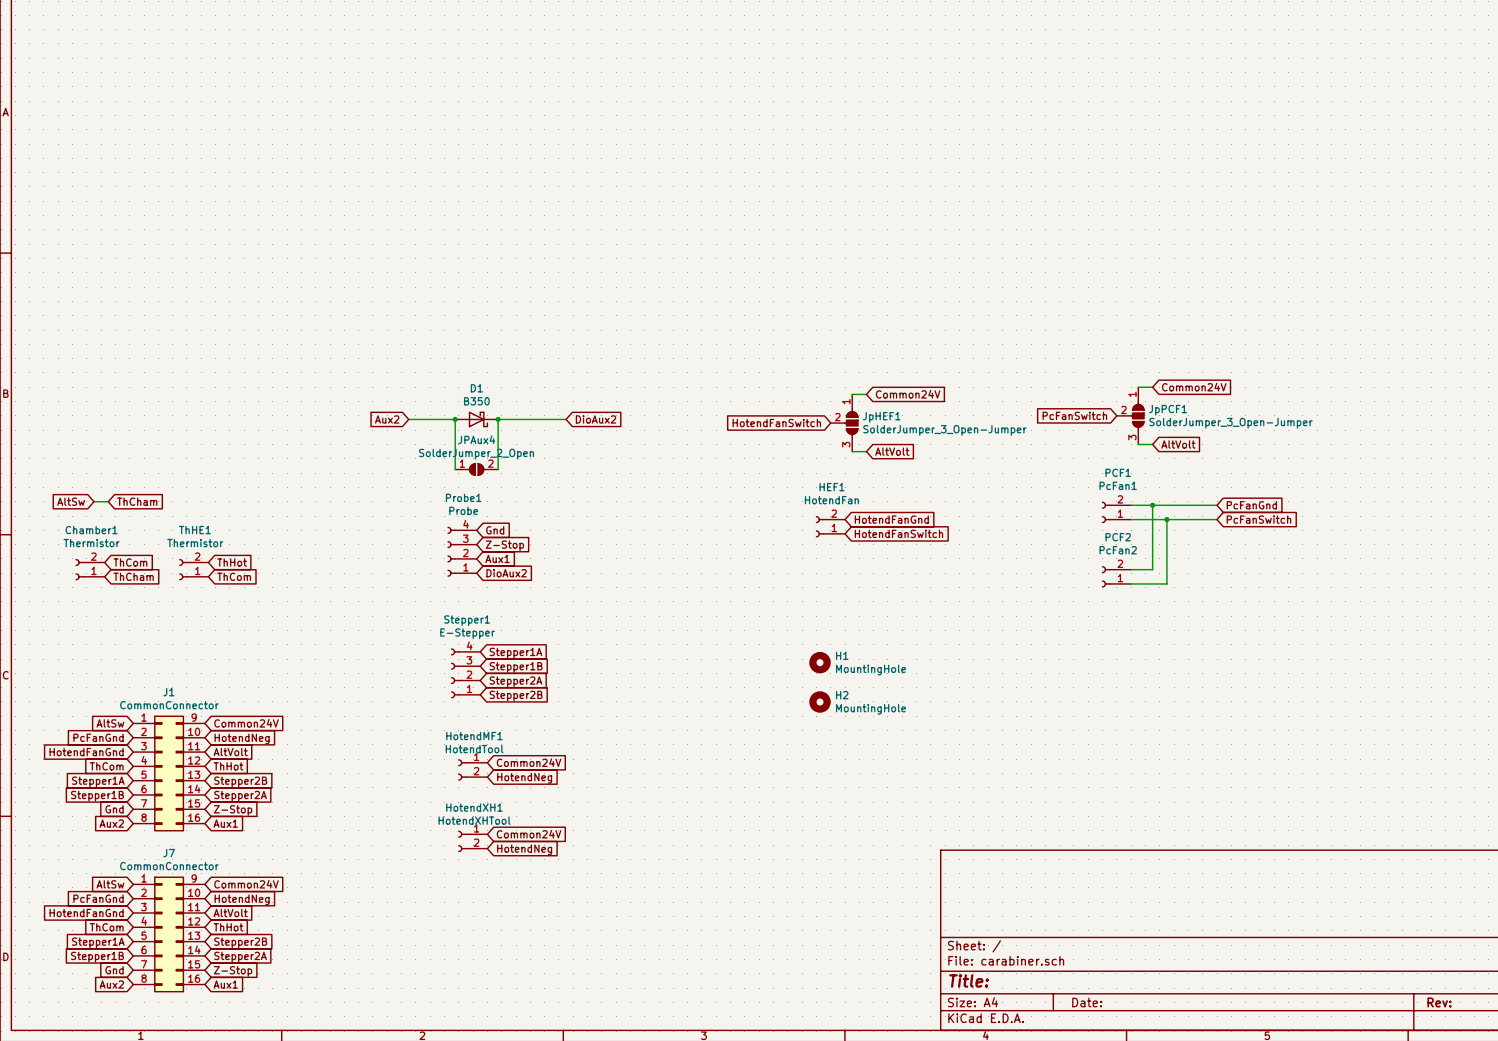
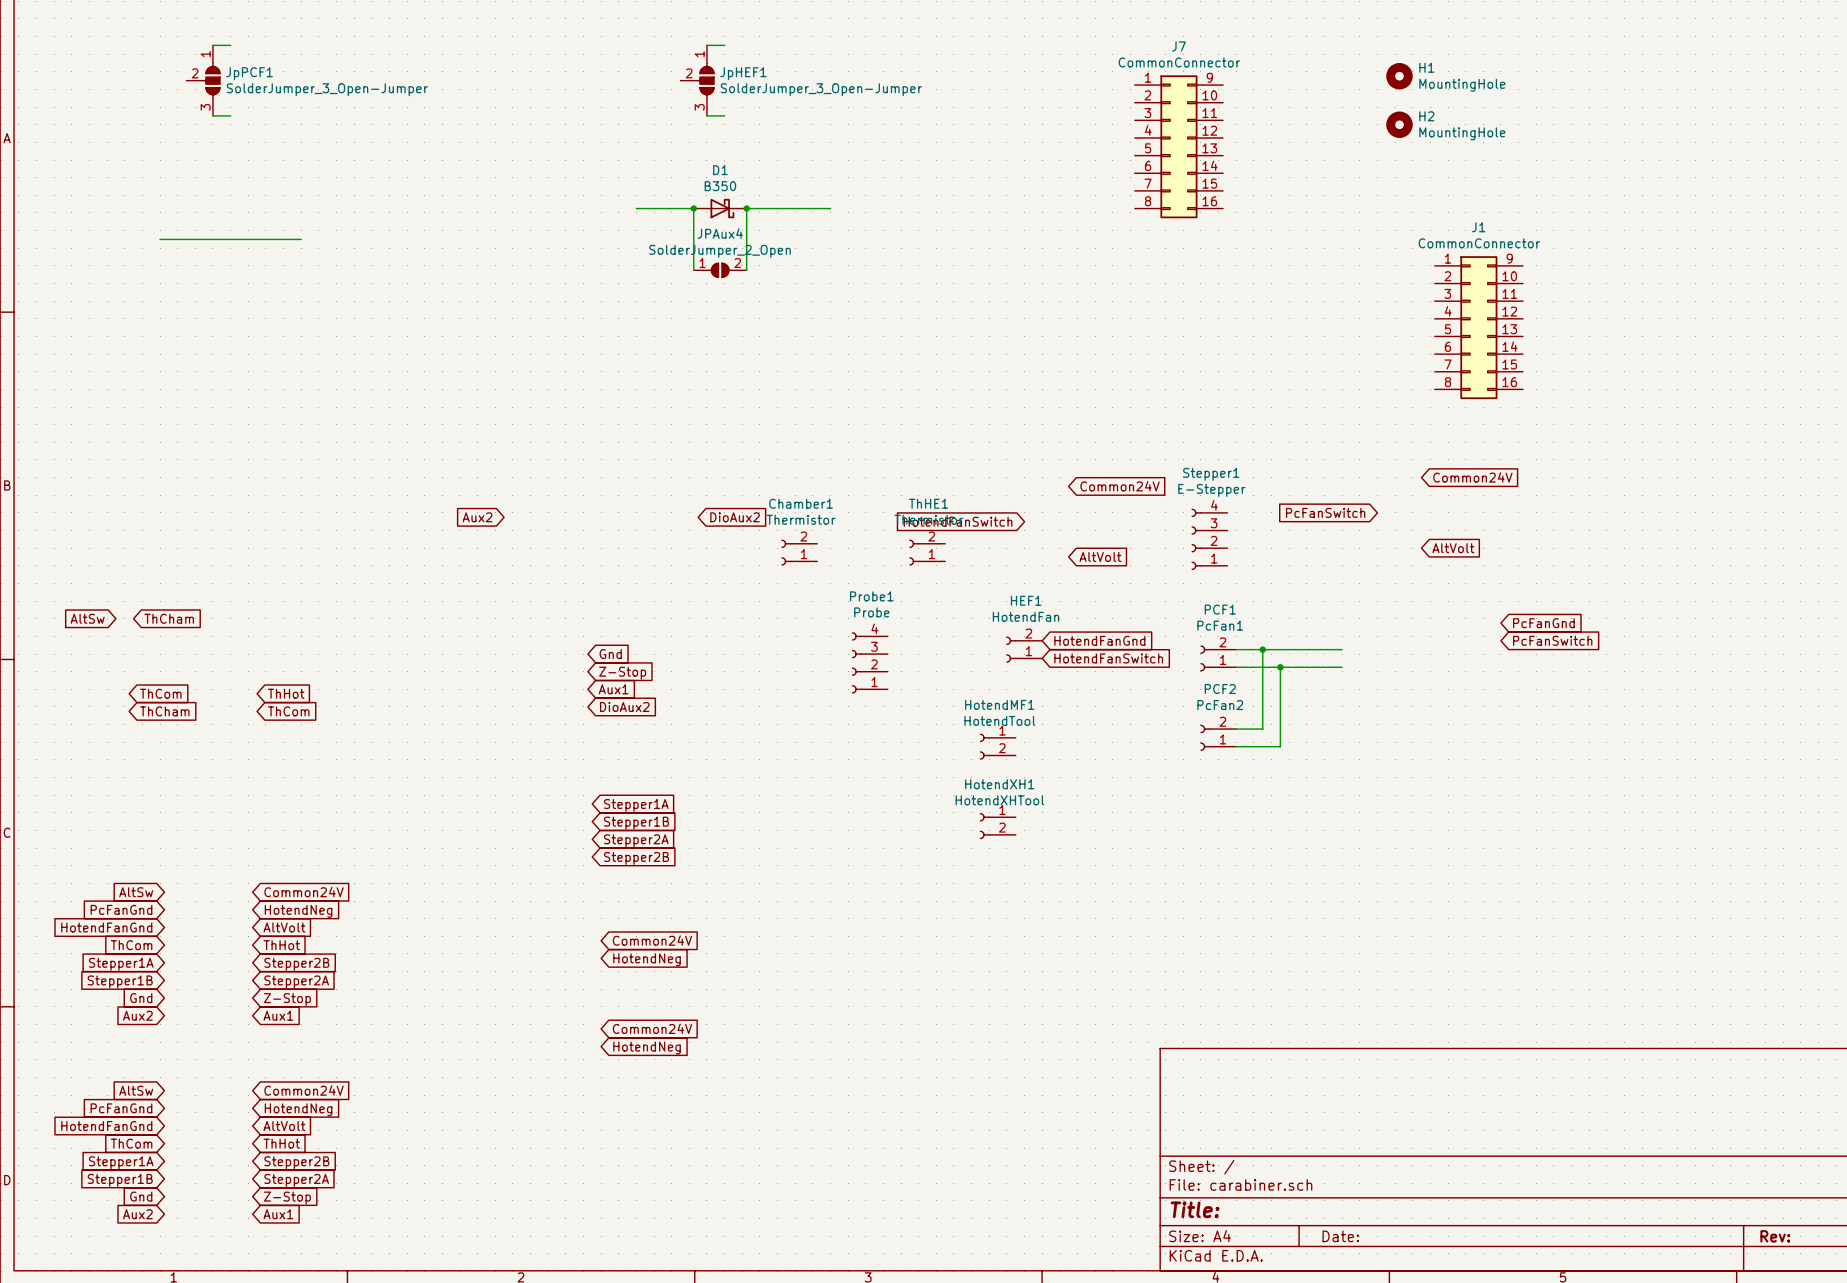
wire: none -> (212, 45) (230, 45)
wire: none -> (706, 45) (724, 45)
wire: none -> (212, 115) (230, 115)
wire: none -> (706, 115) (724, 115)
wire: none -> (636, 208) (693, 208) (693, 270)
junction: none -> (693, 208)
junction: none -> (746, 208)
wire: none -> (830, 208) (746, 208) (746, 270)
wire: none -> (160, 239) (301, 239)
wire: (1138, 387) (1152, 387) -> none
wire: (852, 394) (866, 394) -> none
JpPCF1 position: (1130, 415) -> (203, 80)
wire: (408, 419) (455, 419) (455, 469) -> none
junction: (455, 419) -> none
D1 position: (476, 419) -> (720, 208)
junction: (498, 419) -> none
wire: (566, 419) (498, 419) (498, 469) -> none
JpHEF1 position: (844, 423) -> (697, 80)
wire: (1138, 444) (1152, 444) -> none
wire: (852, 451) (866, 451) -> none
JPAux4 position: (476, 469) -> (720, 270)
wire: (94, 501) (108, 501) -> none
wire: (1131, 505) (1217, 505) -> (1236, 649) (1342, 649)
wire: (1152, 505) (1152, 569) (1131, 569) -> (1262, 649) (1262, 729) (1236, 729)
junction: (1152, 505) -> none
PCF1 position: (1116, 512) -> (1218, 658)
wire: (1131, 519) (1217, 519) -> (1236, 667) (1342, 667)
wire: (1166, 519) (1166, 583) (1131, 583) -> (1280, 667) (1280, 746) (1236, 746)
junction: (1166, 519) -> none
junction: none -> (1262, 649)
junction: none -> (1280, 667)
Probe1 position: (462, 551) -> (869, 662)
Chamber1 position: (90, 569) -> (799, 552)
ThHE1 position: (193, 569) -> (927, 552)
PCF2 position: (1116, 576) -> (1218, 737)
H1 position: (820, 662) -> (1399, 76)
Stepper1 position: (465, 673) -> (1209, 539)
H2 position: (820, 701) -> (1399, 124)
HotendMF1 position: (472, 769) -> (997, 746)
J1 position: (169, 773) -> (1478, 327)
HotendXH1 position: (472, 841) -> (997, 826)
J7 position: (169, 934) -> (1178, 146)

